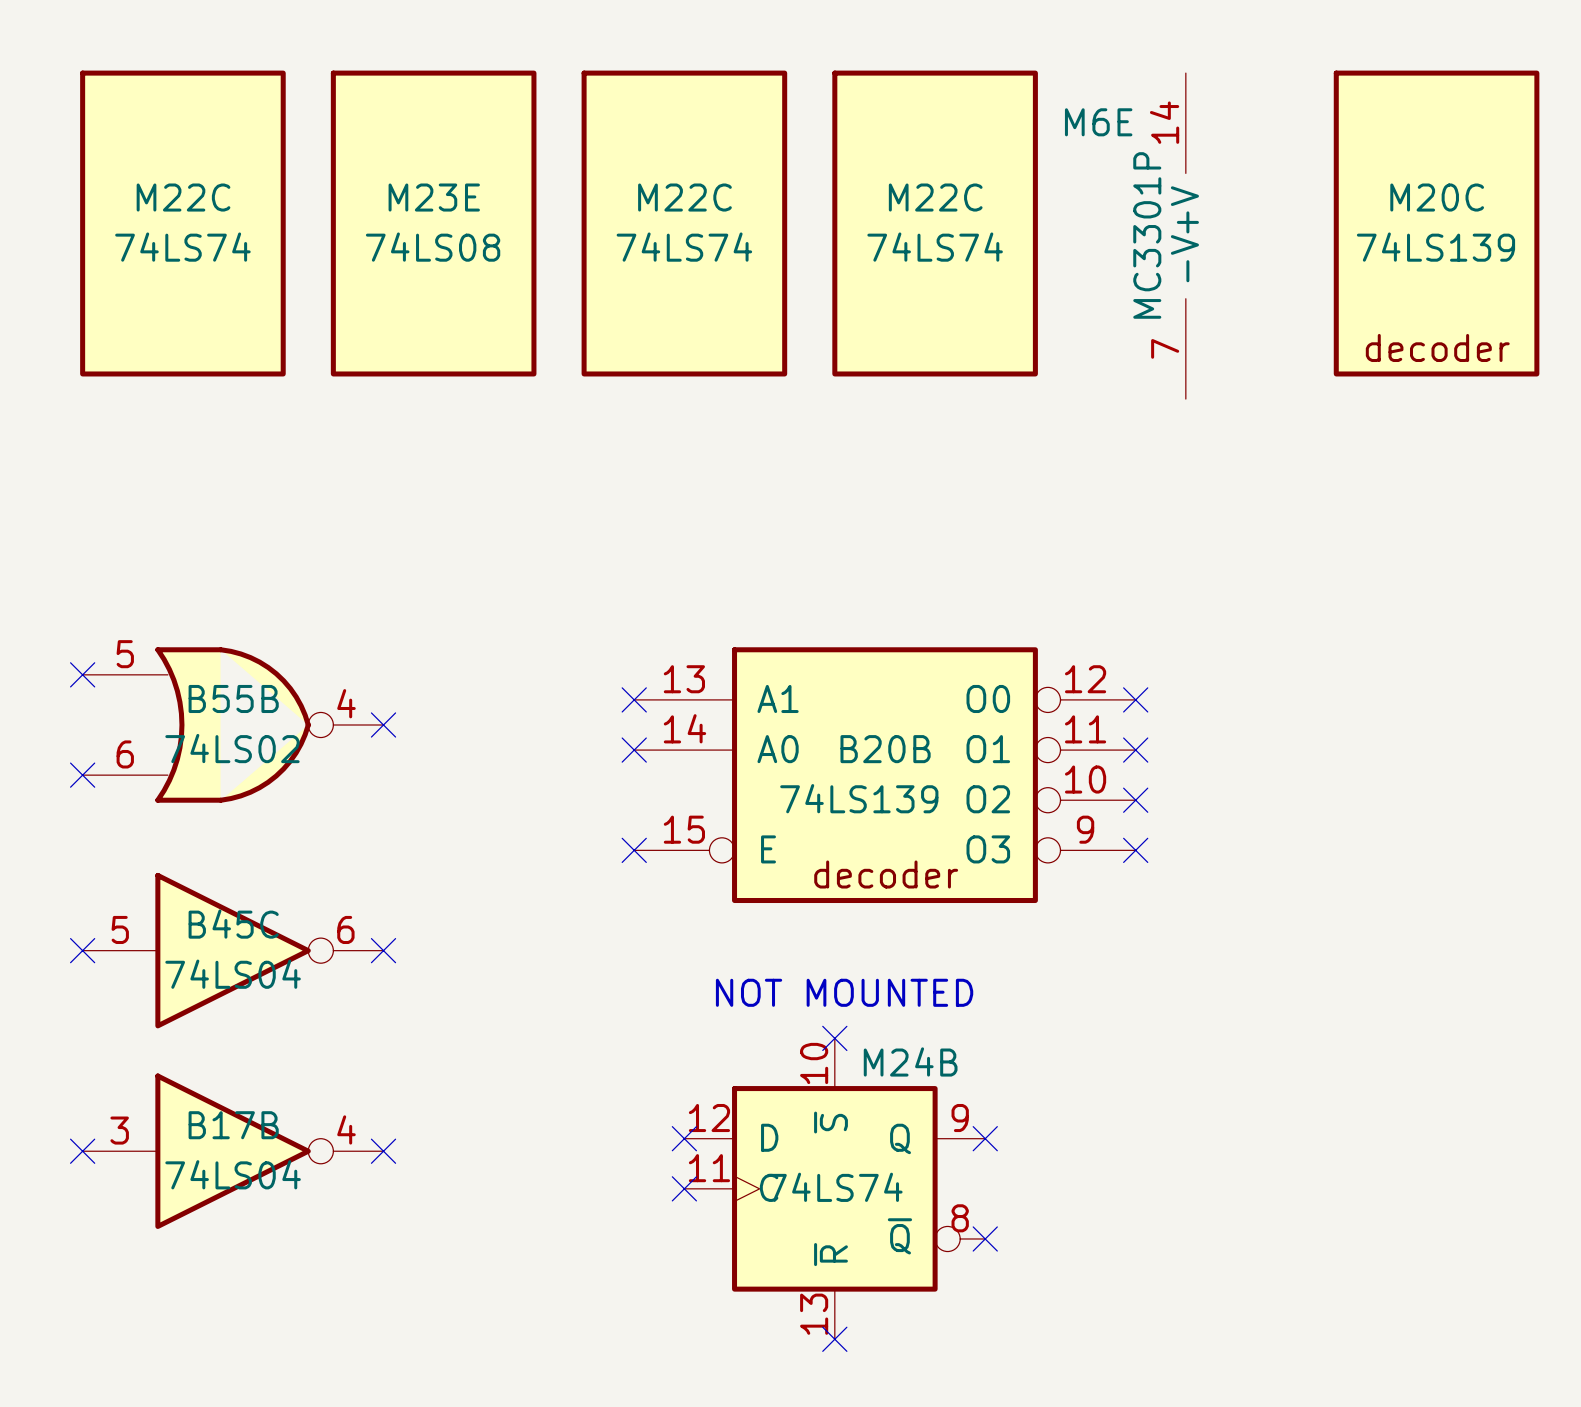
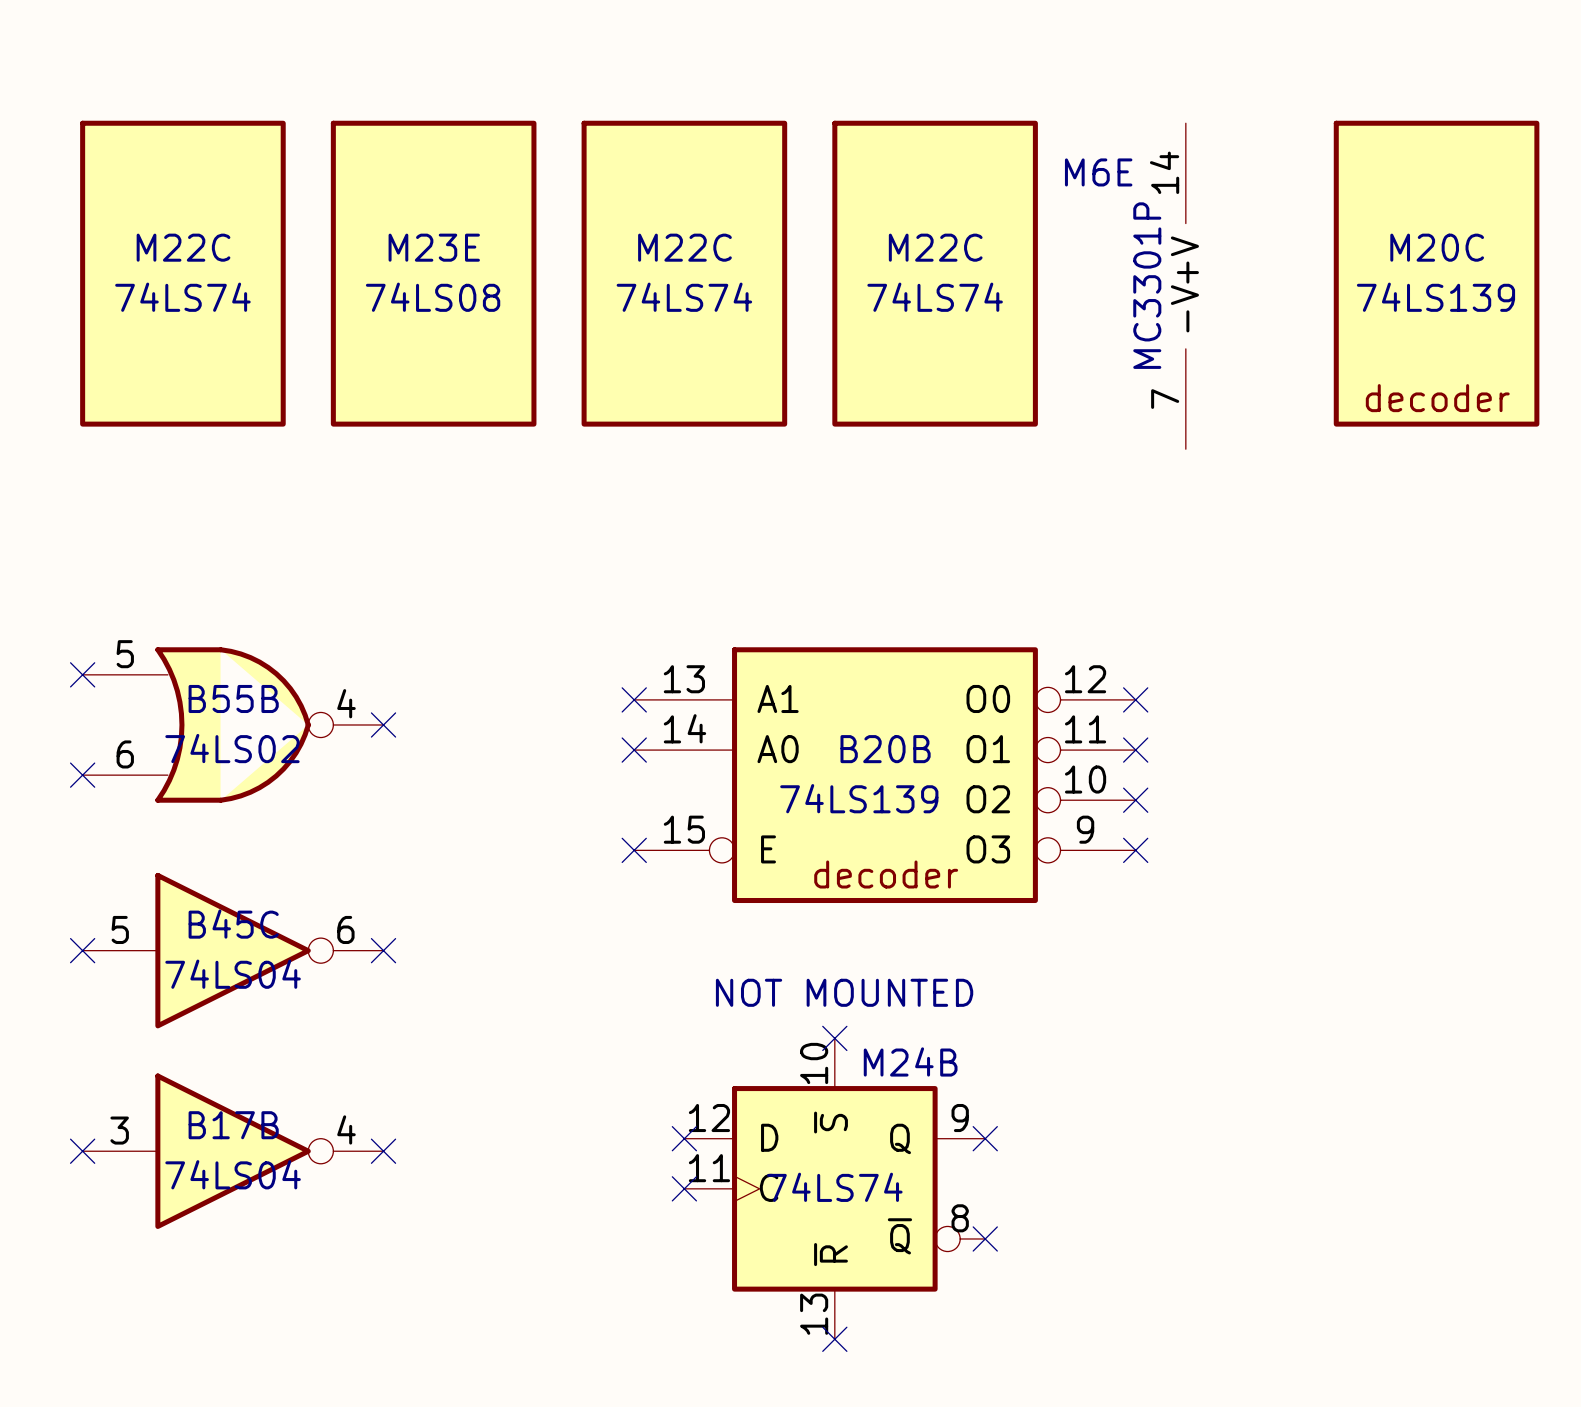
M22C position: (182, 223) -> (182, 273)
M23E position: (433, 223) -> (433, 273)
M22C position: (684, 223) -> (684, 273)
M22C position: (935, 223) -> (935, 273)
M20C position: (1436, 223) -> (1436, 273)
M6E position: (1185, 236) -> (1185, 286)

